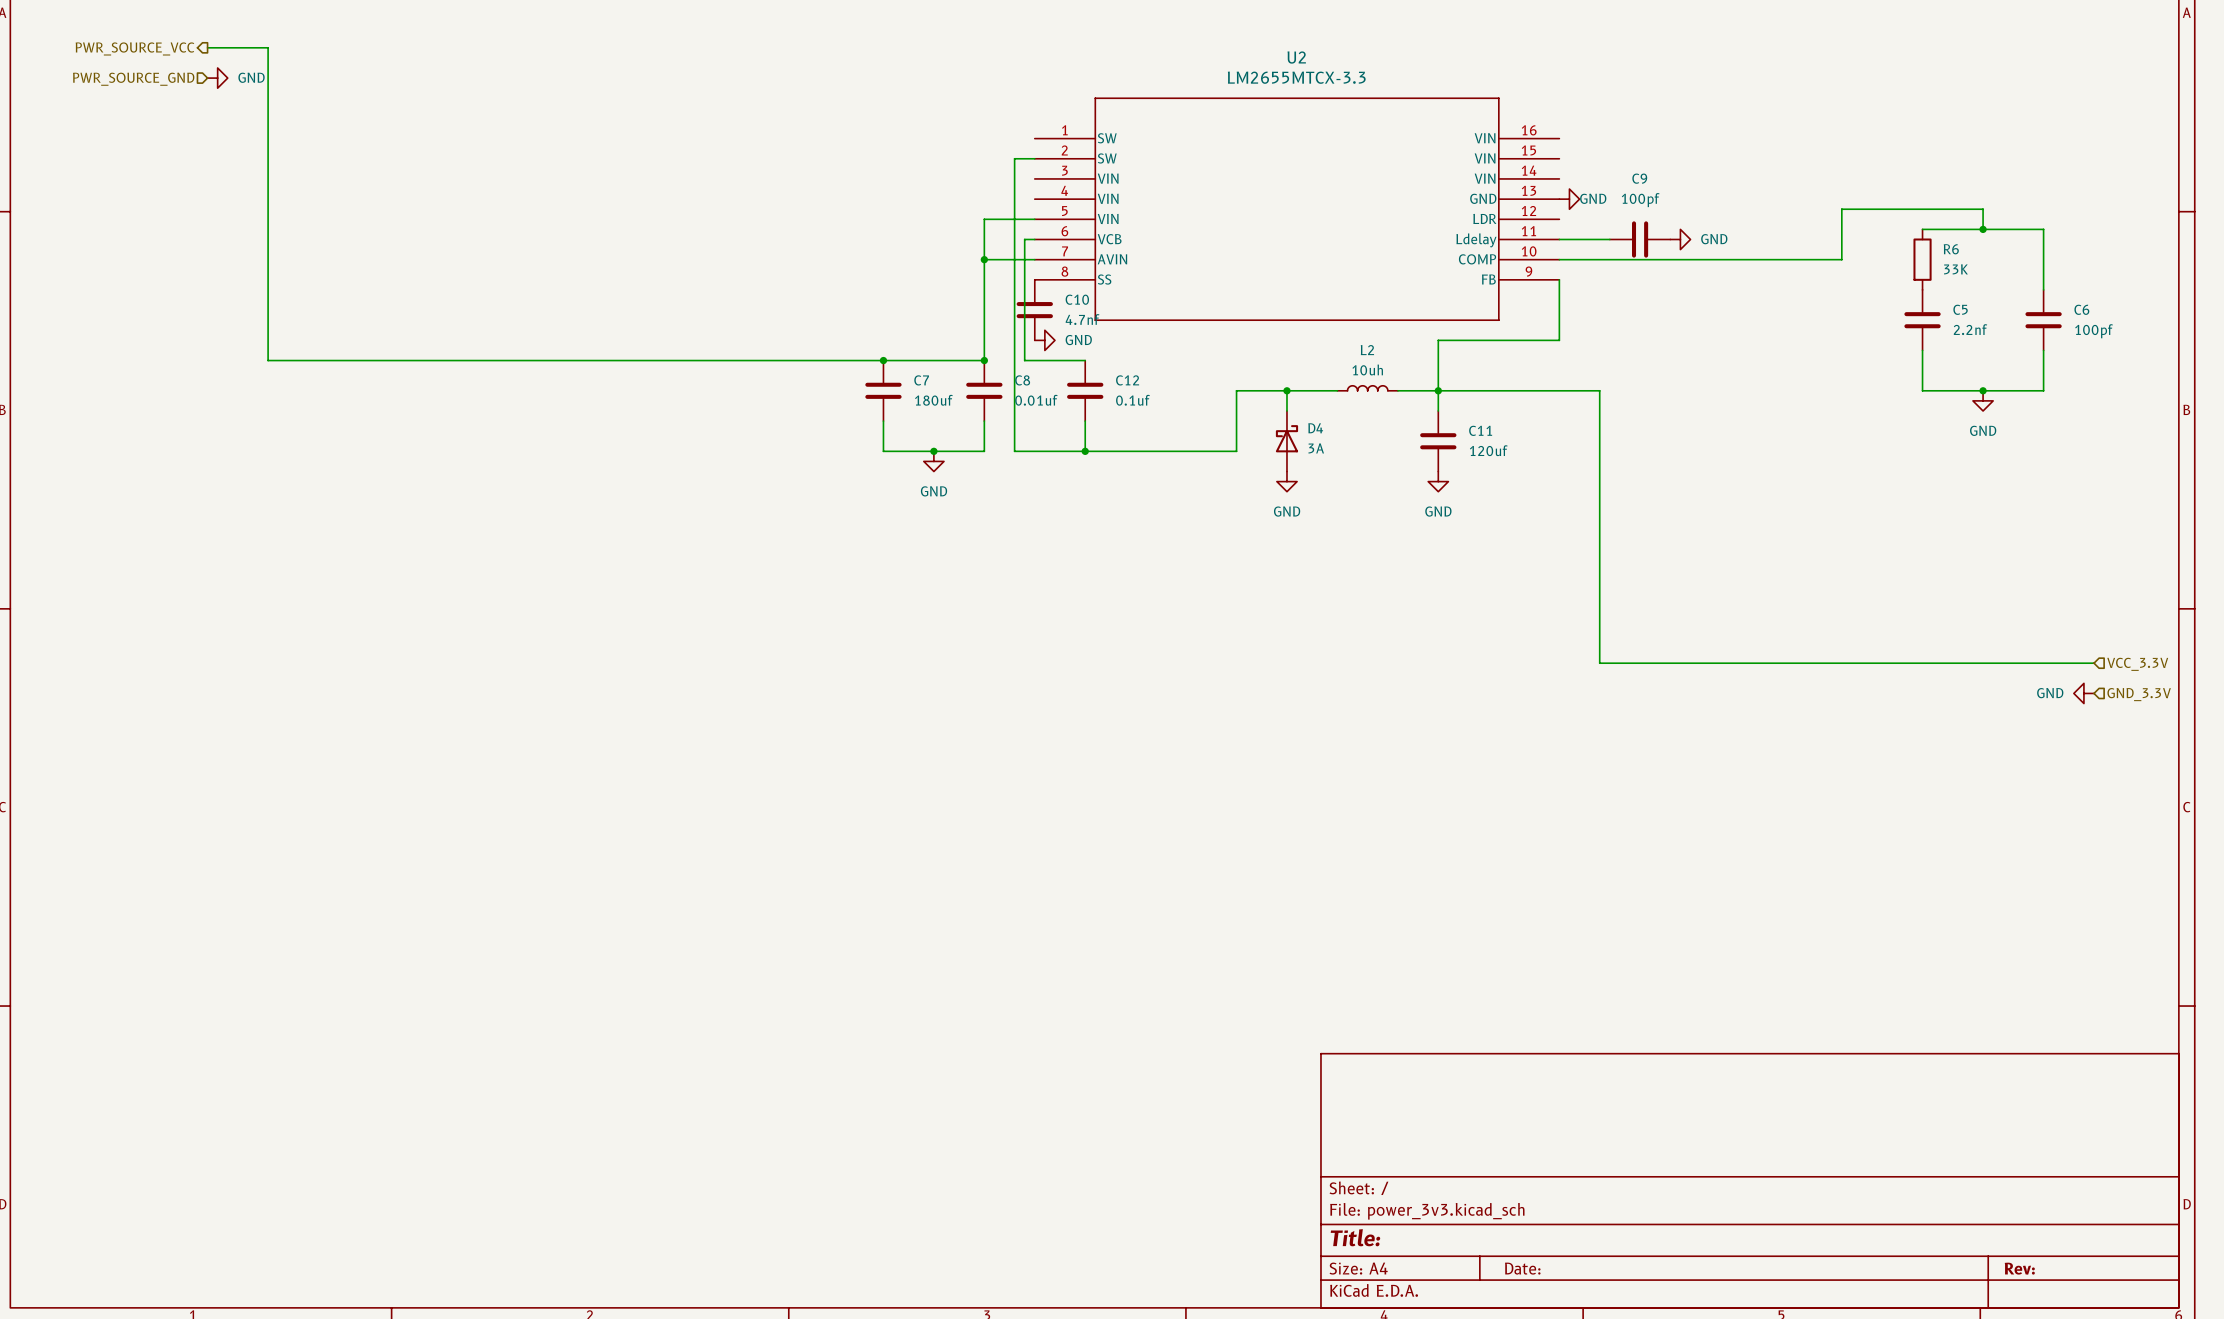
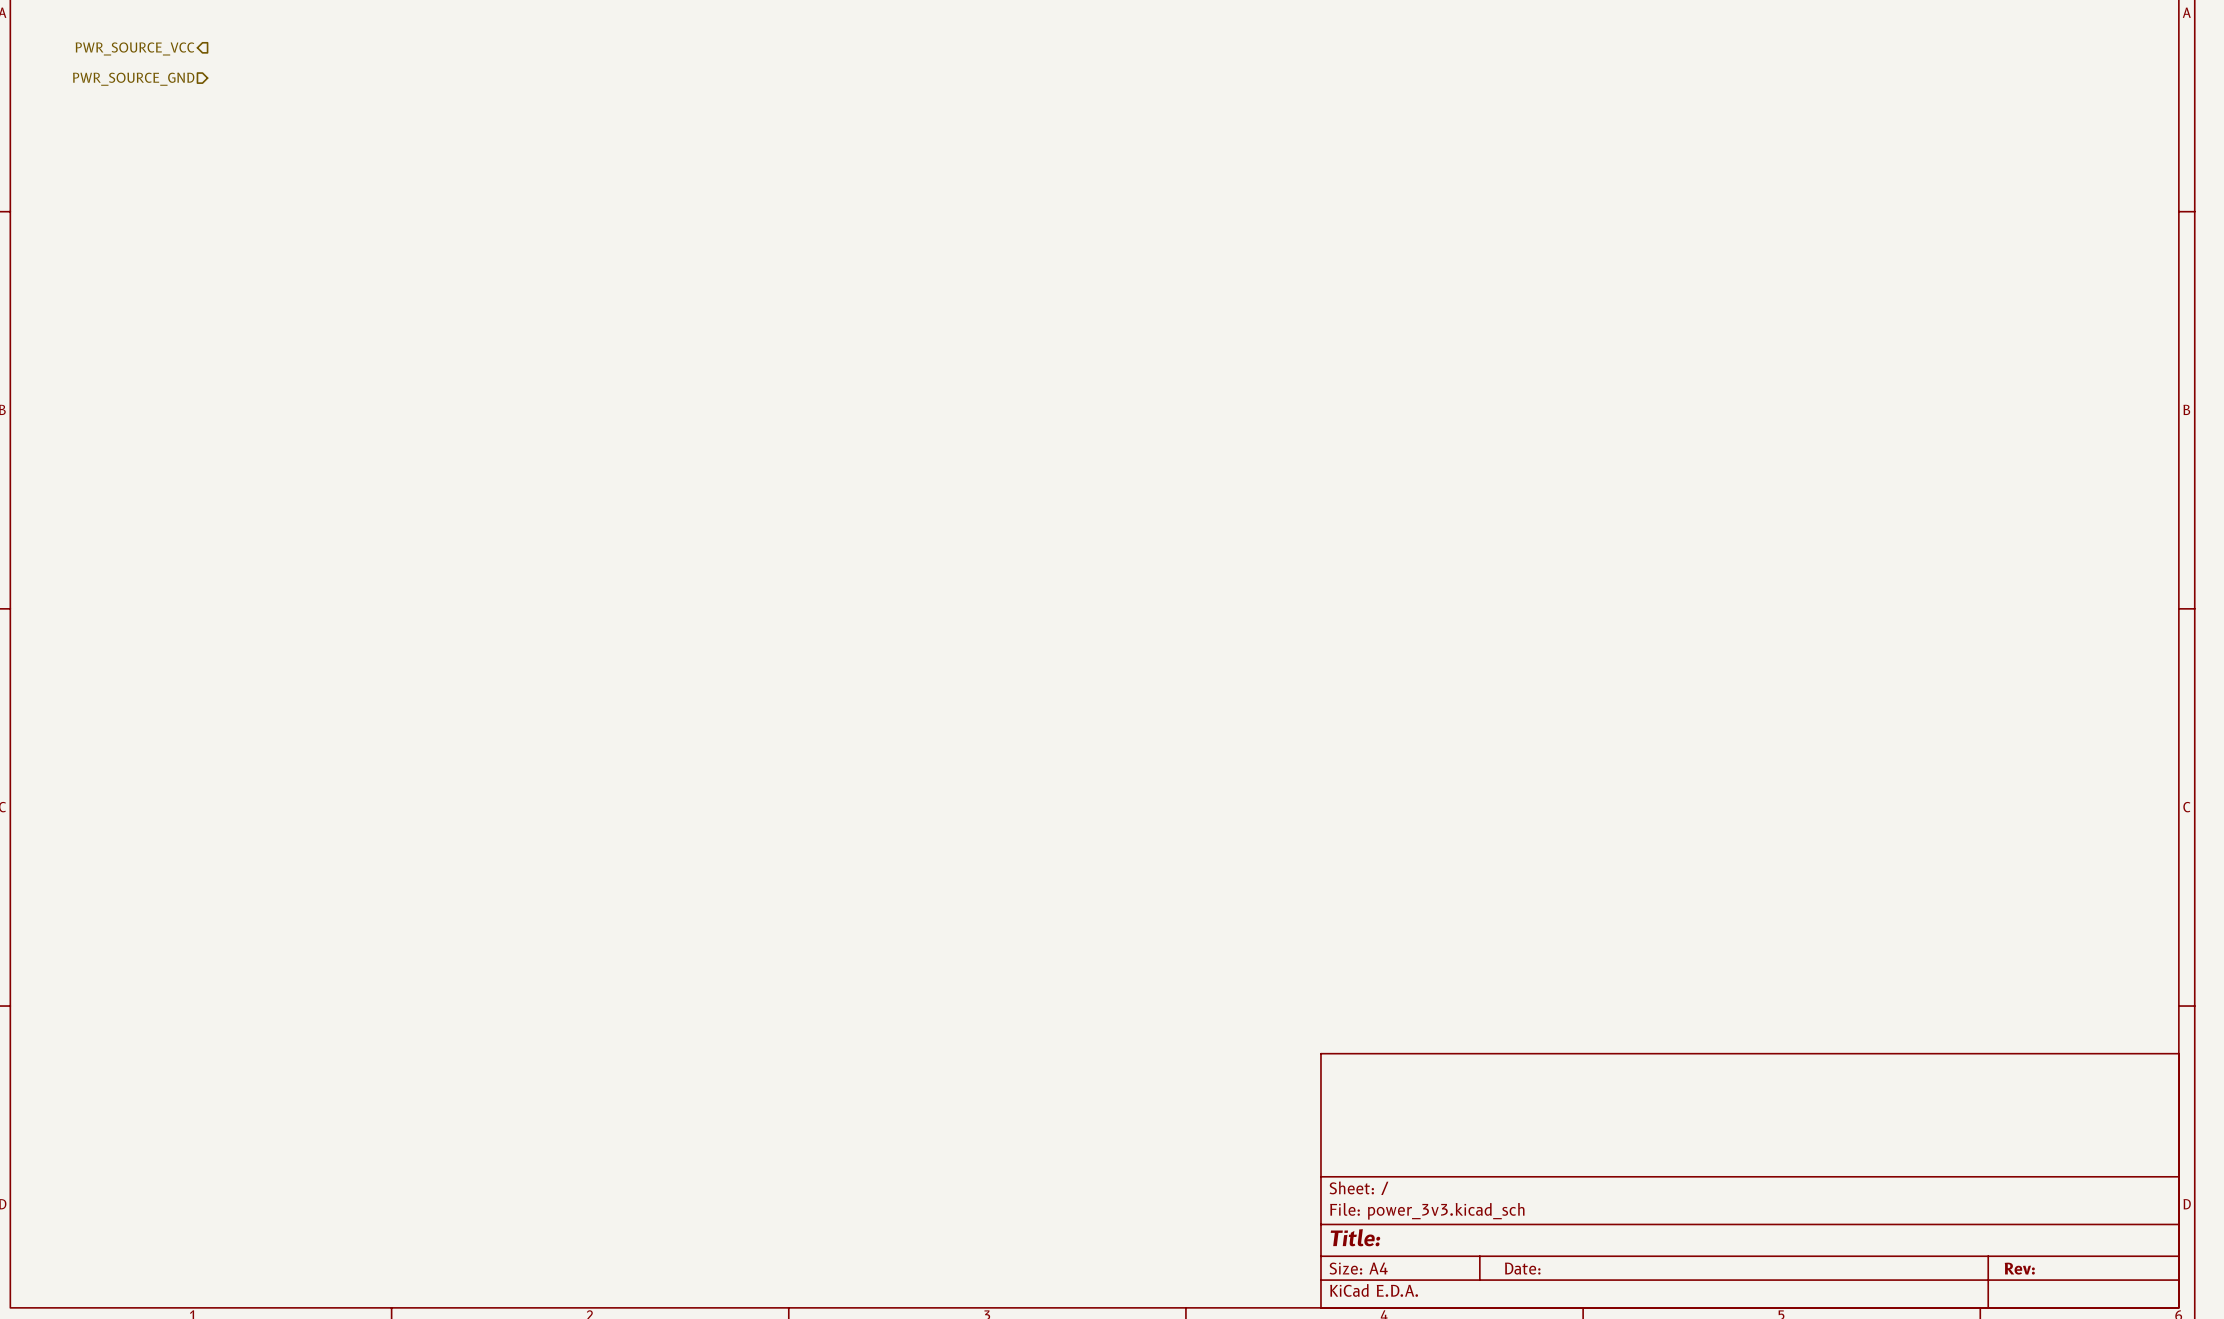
wire: (207, 47) (268, 47) (268, 360) (984, 360) (984, 219) (1034, 219) -> none
power symbol: GND (217, 78) -> none
wire: (1034, 158) (1014, 158) (1014, 451) (1236, 451) (1236, 390) (1337, 390) -> none
power symbol: GND (1569, 199) -> none
U2: LM2655MTCX-3.3 (1297, 209) -> none
wire: (1922, 229) (2043, 229) (2043, 289) -> none
wire: (1983, 229) (1983, 209) (1841, 209) (1841, 259) (1559, 259) -> none
junction: (1983, 229) -> none
wire: (1034, 239) (1024, 239) (1024, 360) (1085, 360) -> none
wire: (1559, 239) (1609, 239) -> none
C9: 100pf (1640, 239) -> none
power symbol: GND (1680, 239) -> none
wire: (984, 259) (1034, 259) -> none
junction: (984, 259) -> none
R6: 33K (1922, 259) -> none
wire: (1559, 279) (1559, 340) (1438, 340) (1438, 410) -> none
C10: 4.7nf (1034, 310) -> none
C5: 2.2nf (1922, 320) -> none
C6: 100pf (2043, 320) -> none
power symbol: GND (1044, 340) -> none
wire: (1922, 350) (1922, 390) (2043, 390) (2043, 350) -> none
junction: (883, 360) -> none
junction: (984, 360) -> none
L2: 10uh (1367, 388) -> none
C7: 180uf (883, 390) -> none
C8: 0.01uf (984, 390) -> none
C12: 0.1uf (1085, 390) -> none
wire: (1286, 390) (1286, 410) -> none
junction: (1286, 390) -> none
wire: (1397, 390) (1599, 390) (1599, 663) (2094, 663) -> none
junction: (1438, 390) -> none
junction: (1983, 390) -> none
power symbol: GND (1983, 400) -> none
wire: (883, 421) (883, 451) (984, 451) (984, 421) -> none
wire: (1085, 421) (1085, 451) -> none
D4: 3A (1286, 441) -> none
C11: 120uf (1438, 441) -> none
junction: (933, 451) -> none
junction: (1085, 451) -> none
power symbol: GND (933, 461) -> none
power symbol: GND (1286, 481) -> none
power symbol: GND (1438, 481) -> none
hierarchical label: VCC_3.3V (2137, 664) -> none
power symbol: GND (2083, 693) -> none
hierarchical label: GND_3.3V (2139, 694) -> none

